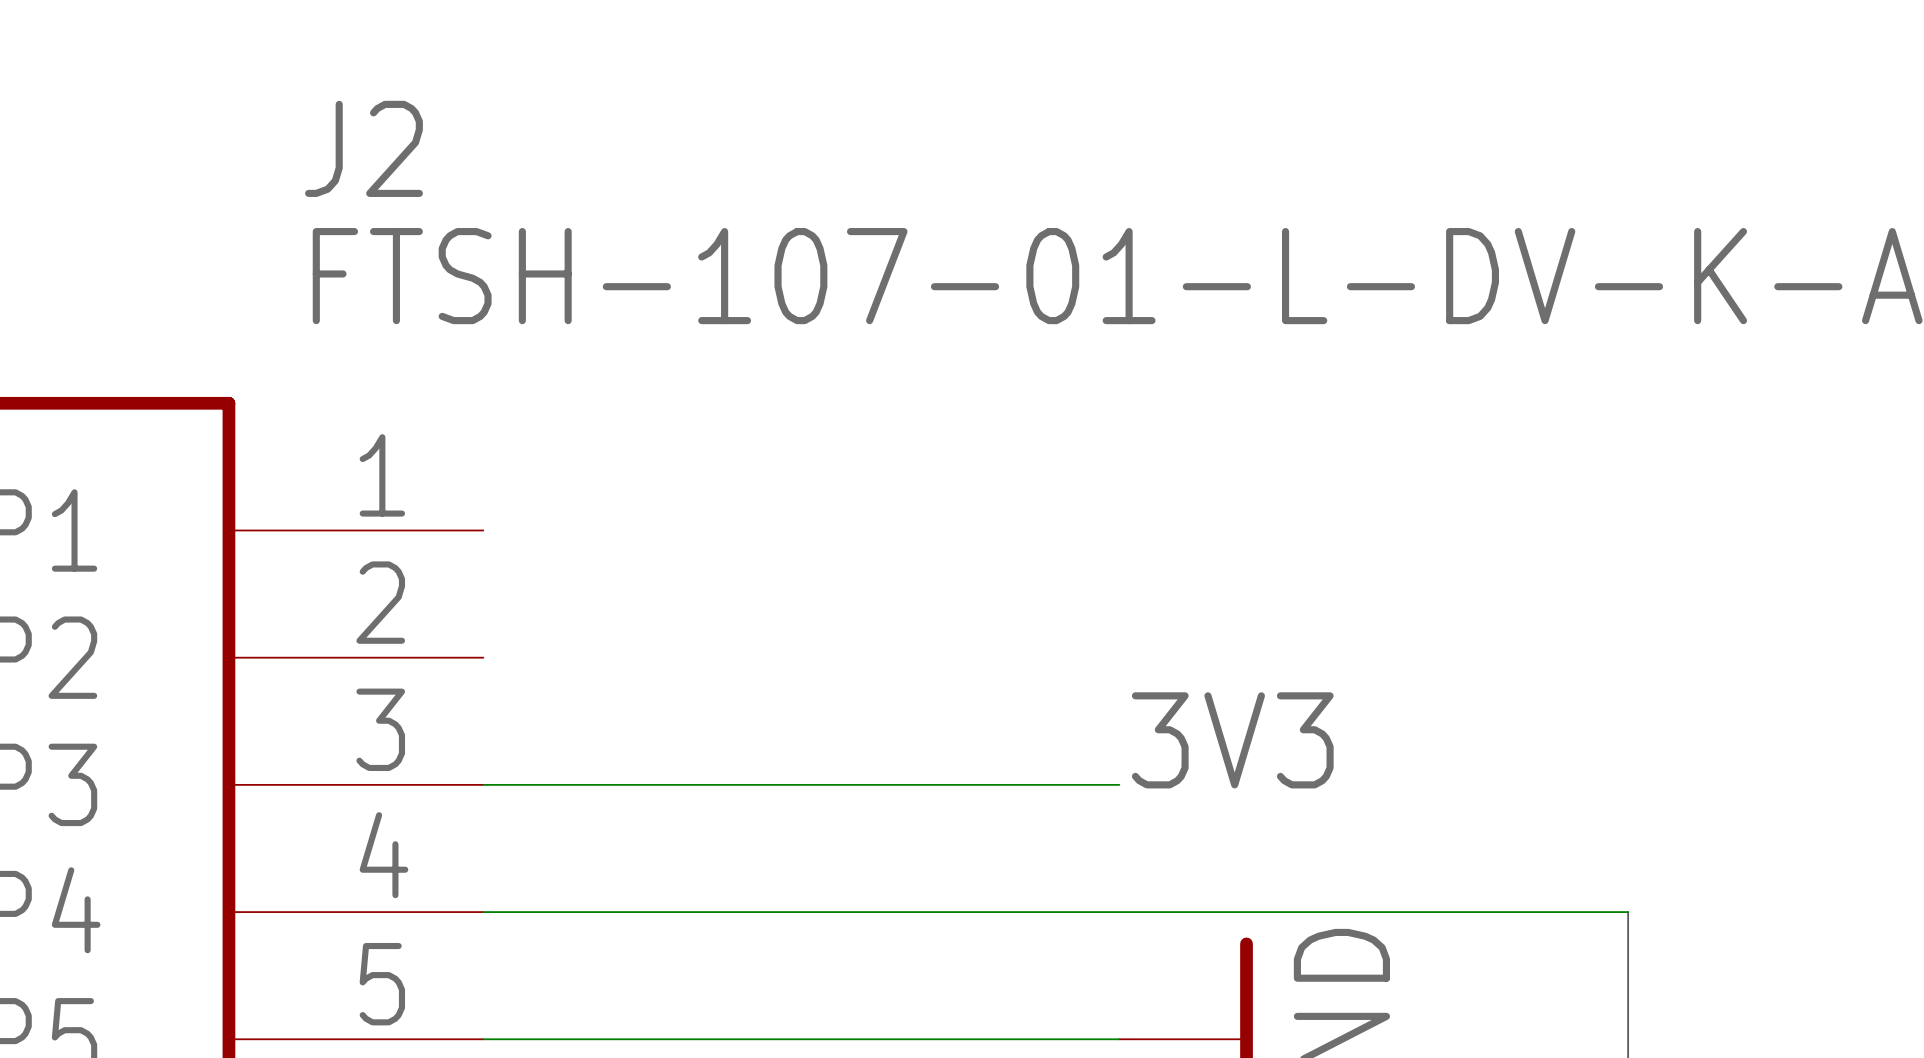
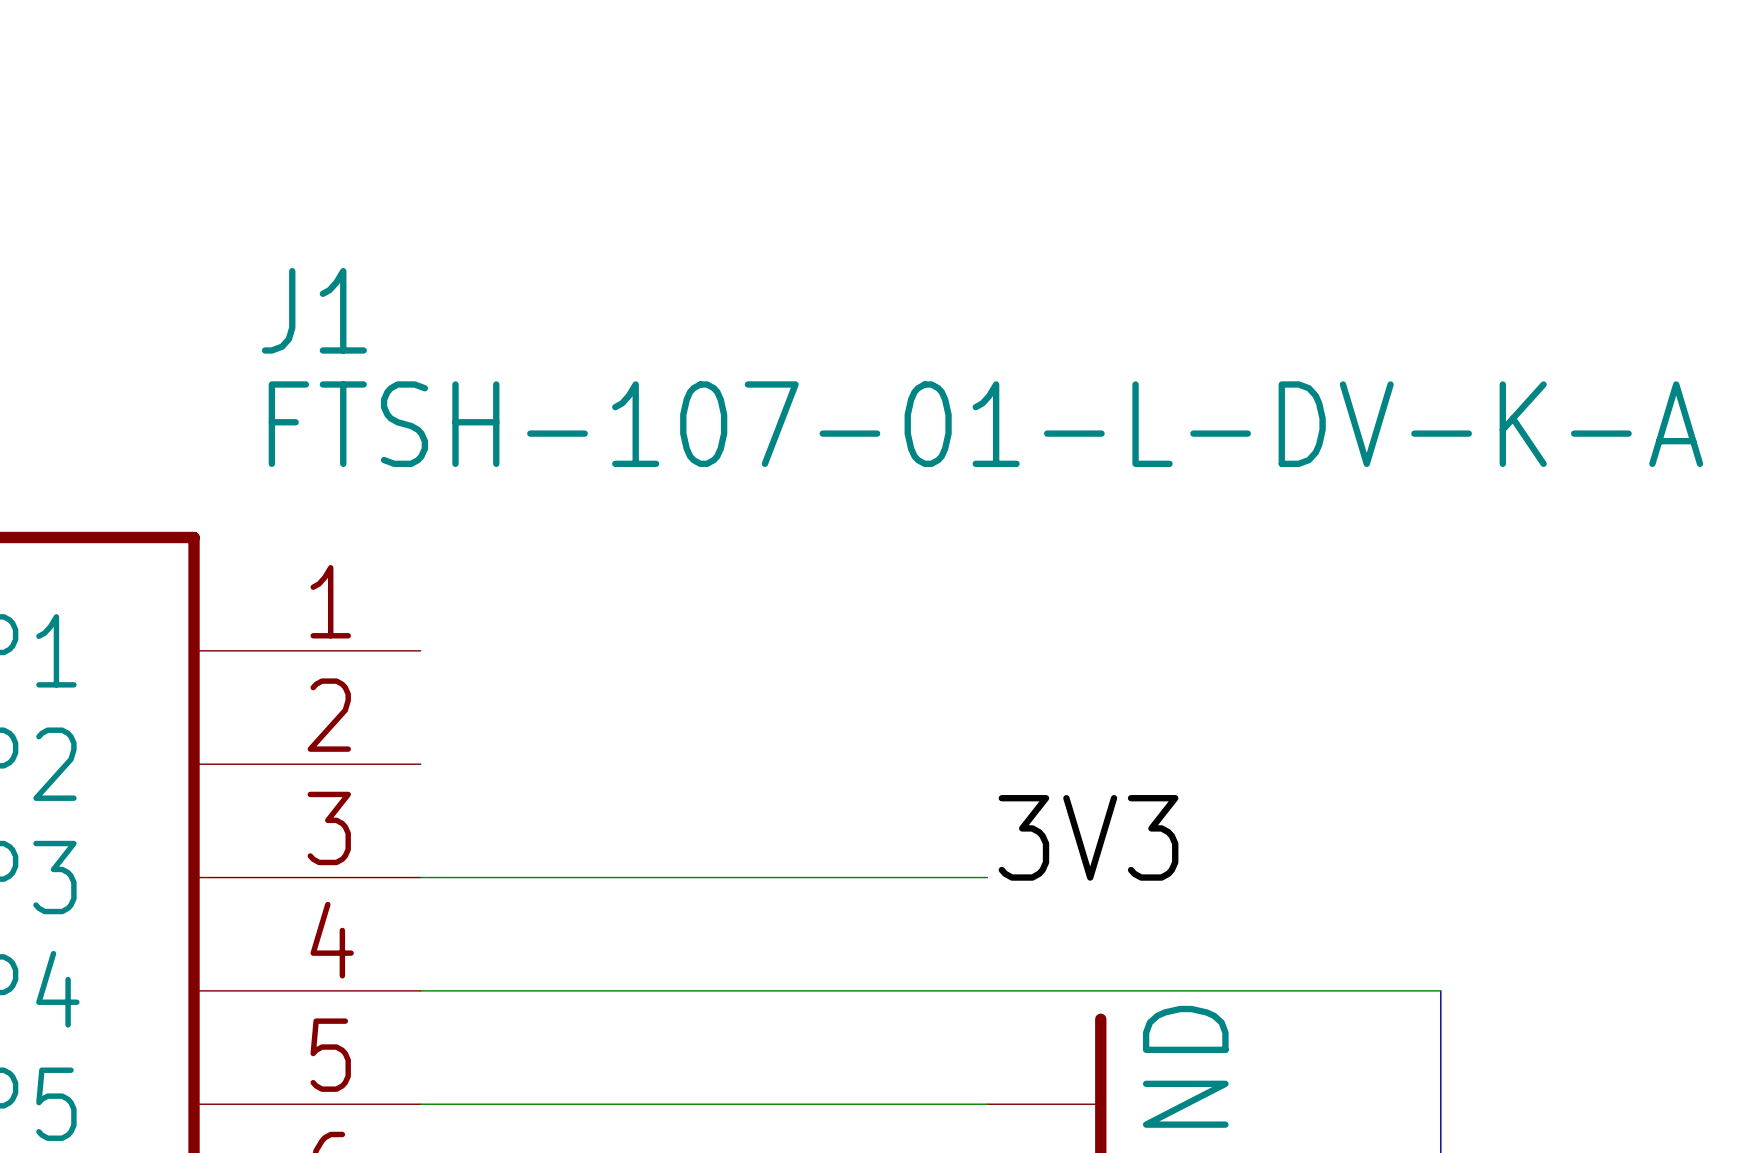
J2 name: J2 (364, 148) -> J1 (314, 310)

